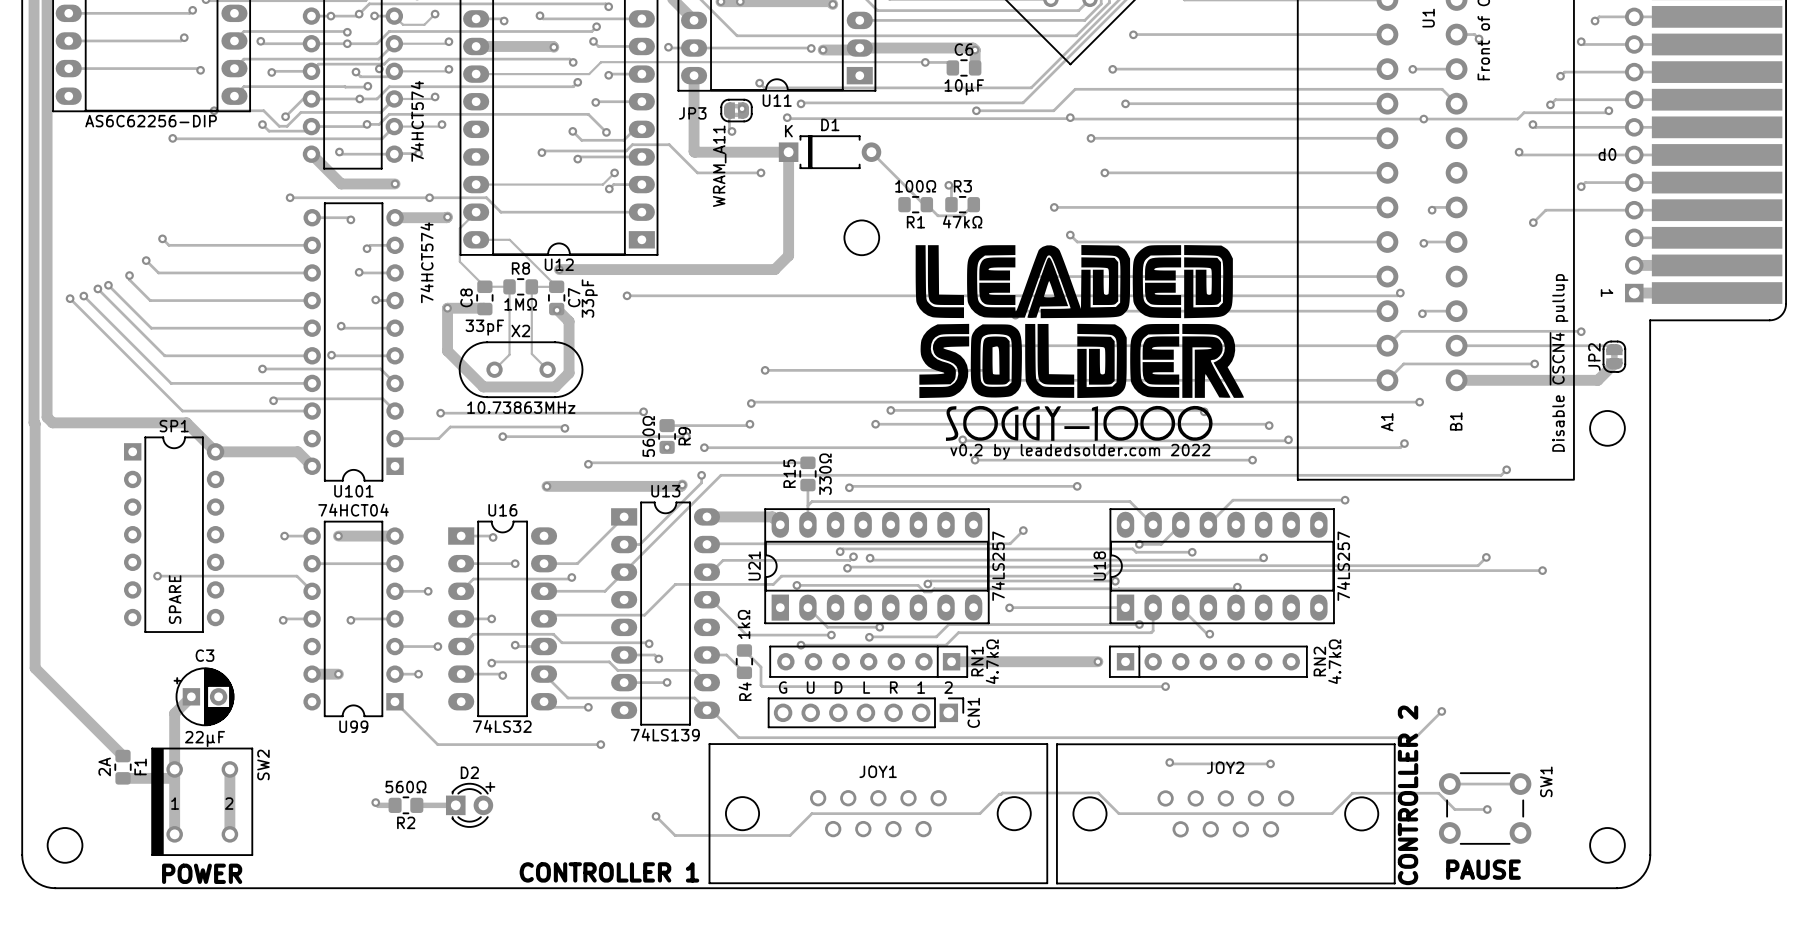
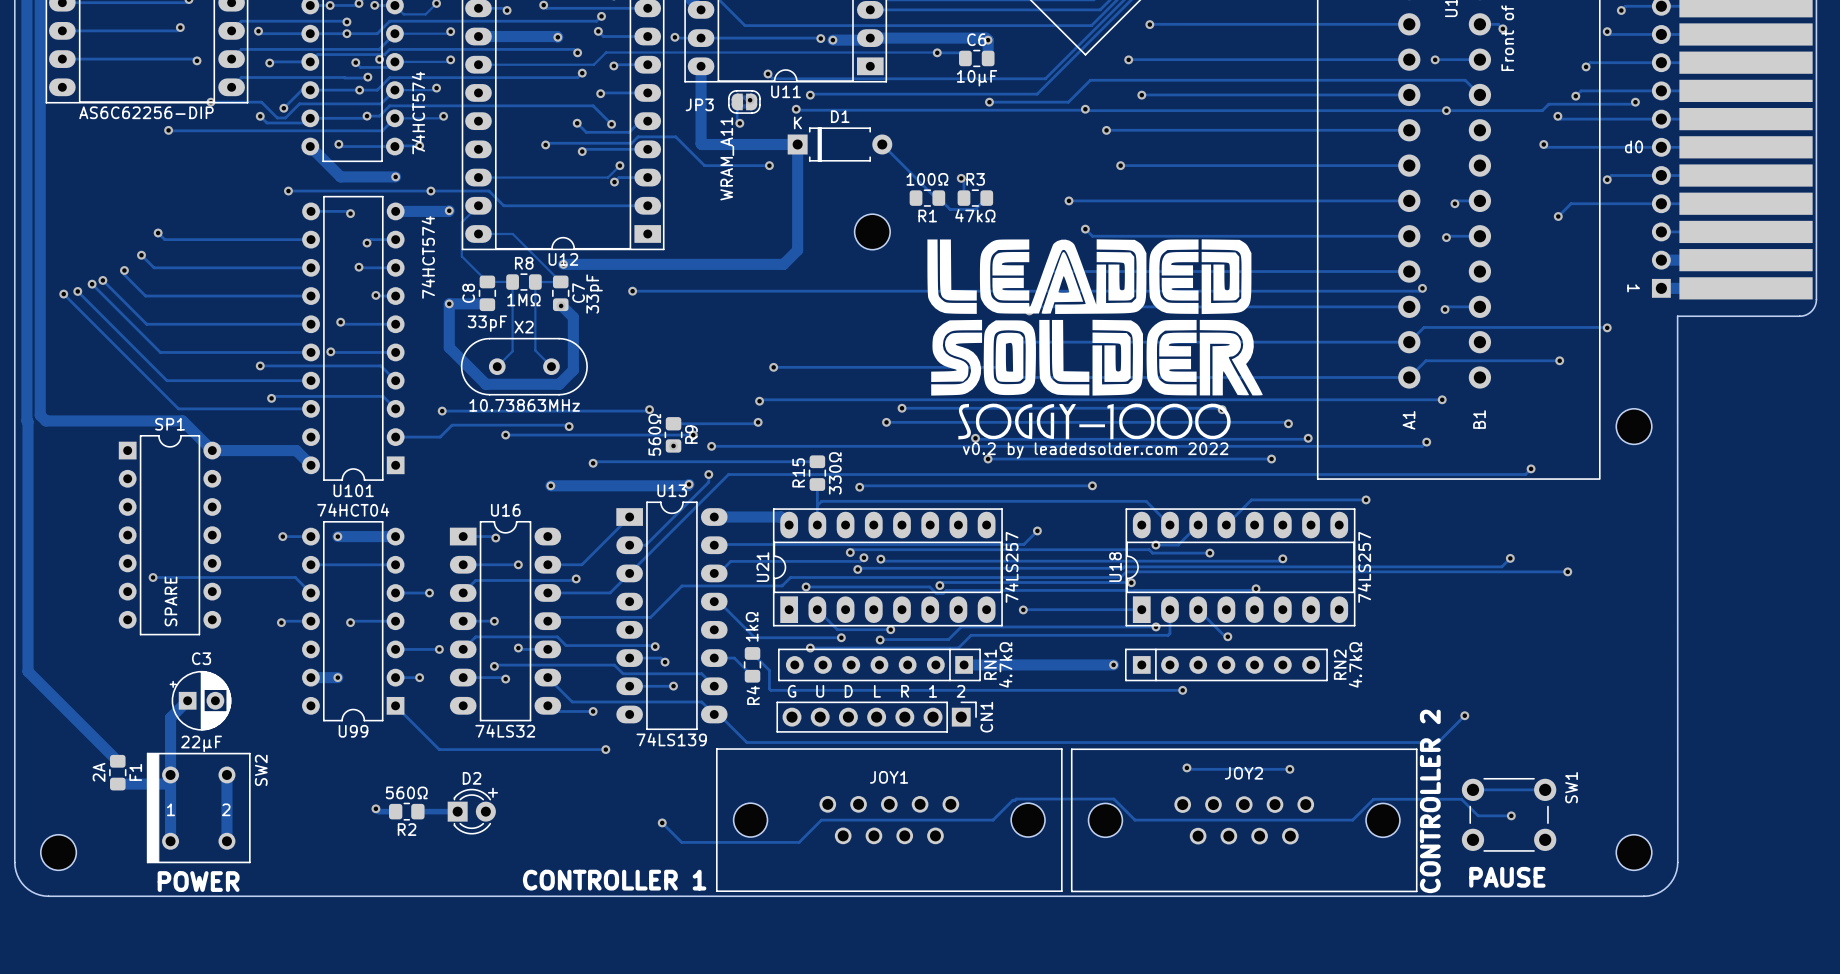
track: (1456, 345) (1610, 345) (1614, 349) -> none
JP2: (1614, 356) -> none
text: Disable ~{CSCN4} pullup (1559, 362) -> none
track: (1614, 363) (1597, 380) (1456, 380) -> none

